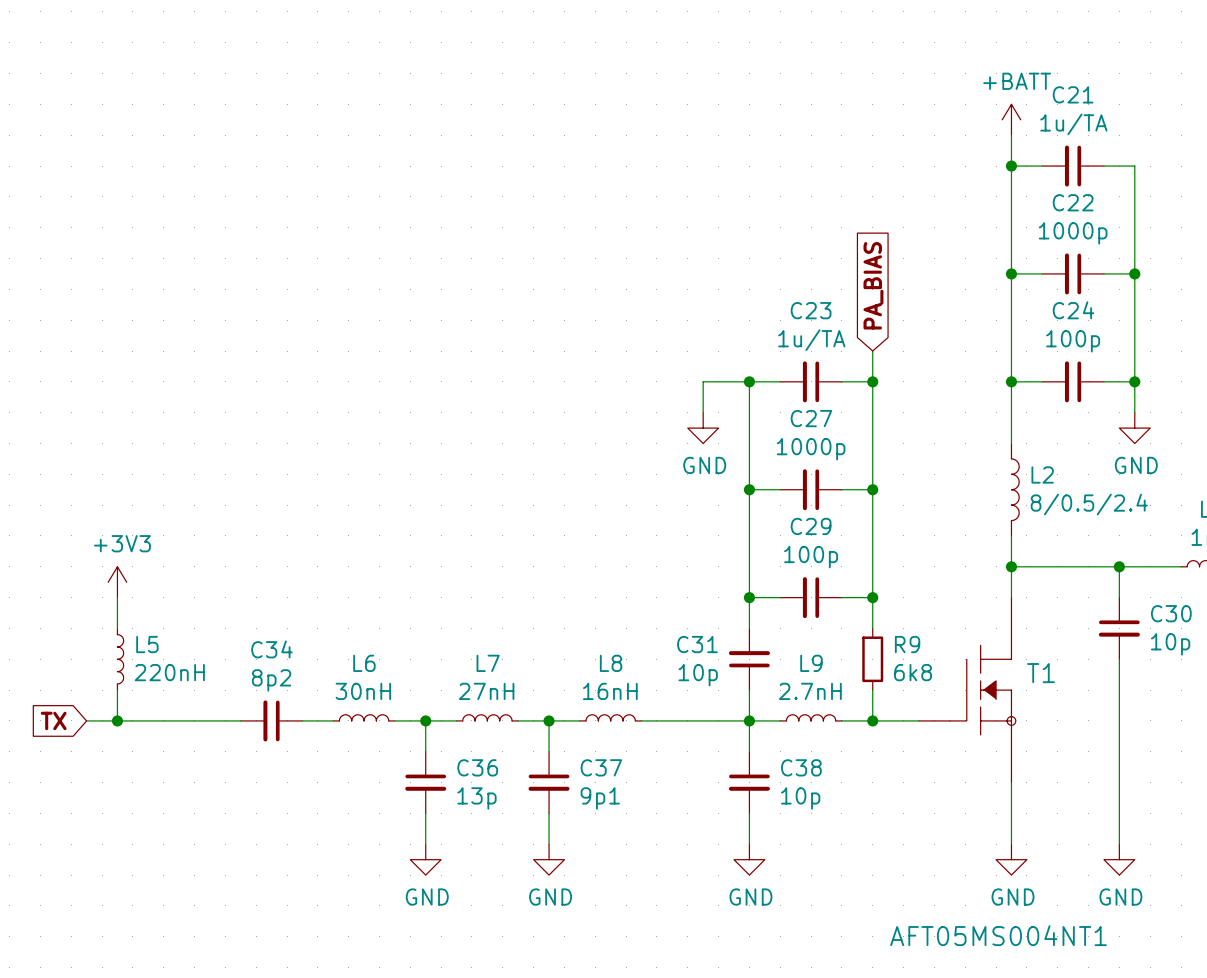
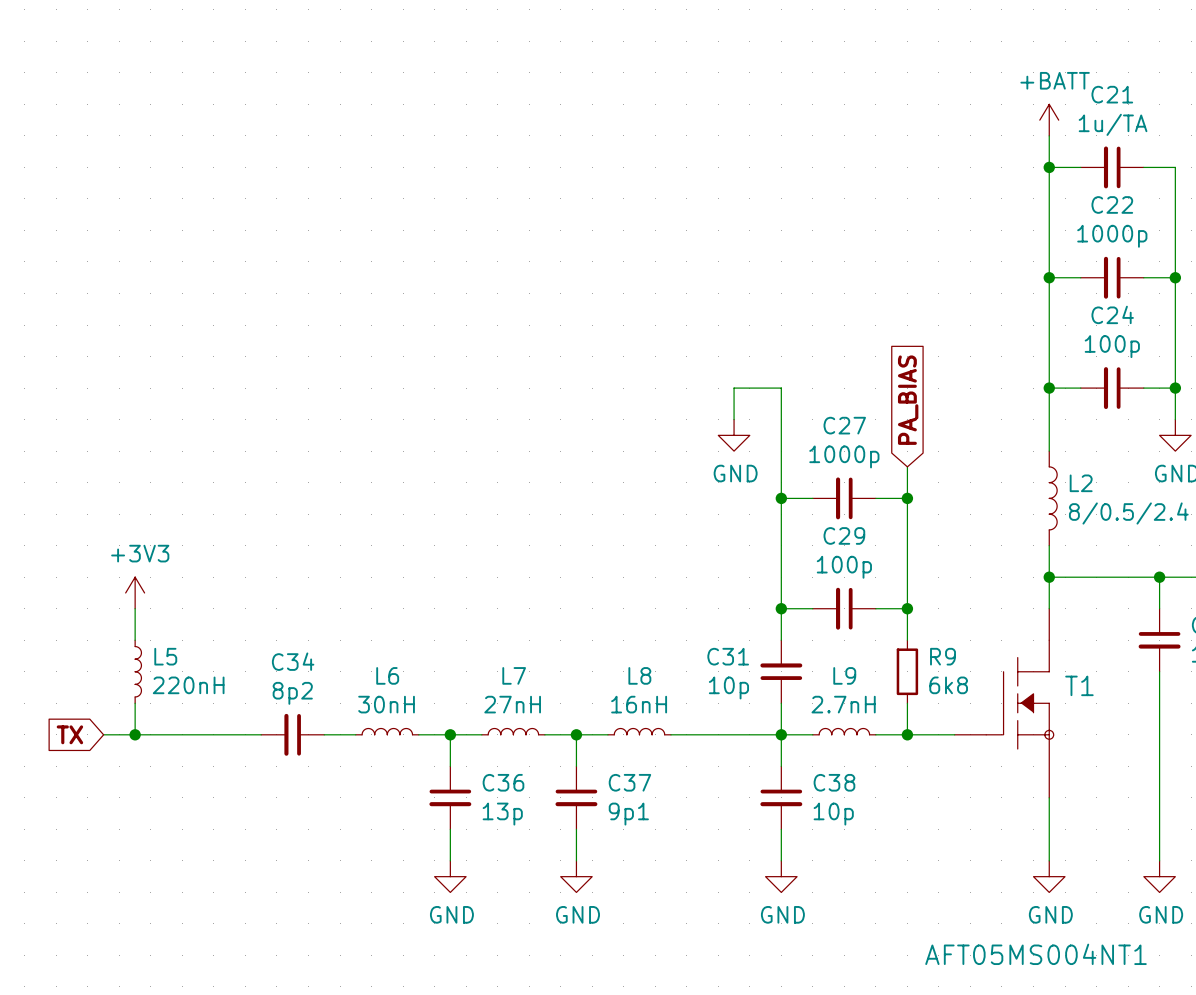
global label position: PA_BIAS (873, 285) -> PA_BIAS (908, 400)
wire: (872, 351) (872, 458) -> none
wire: (749, 381) (780, 381) -> none
junction: (749, 381) -> none
C23: 1u/TA (811, 381) -> none
wire: (841, 381) (872, 381) -> none
junction: (872, 381) -> none

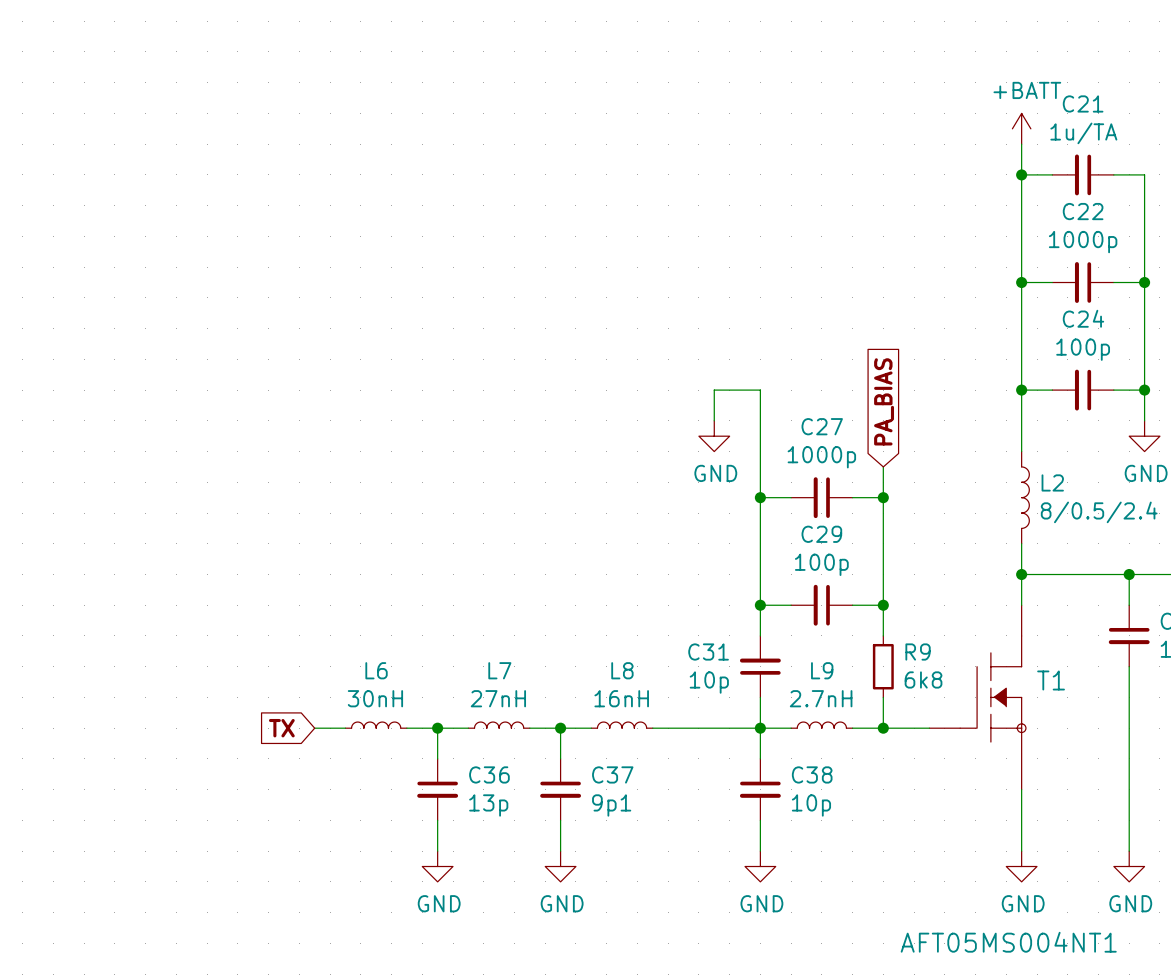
power symbol: +3V3 (135, 592) -> none
wire: (135, 608) (135, 640) -> none
L5: 220nH (138, 671) -> none
wire: (135, 703) (135, 734) -> none
global label position: TX (69, 734) -> TX (281, 728)
wire: (103, 734) (261, 734) -> none
junction: (135, 734) -> none
C34: 8p2 (292, 734) -> none

